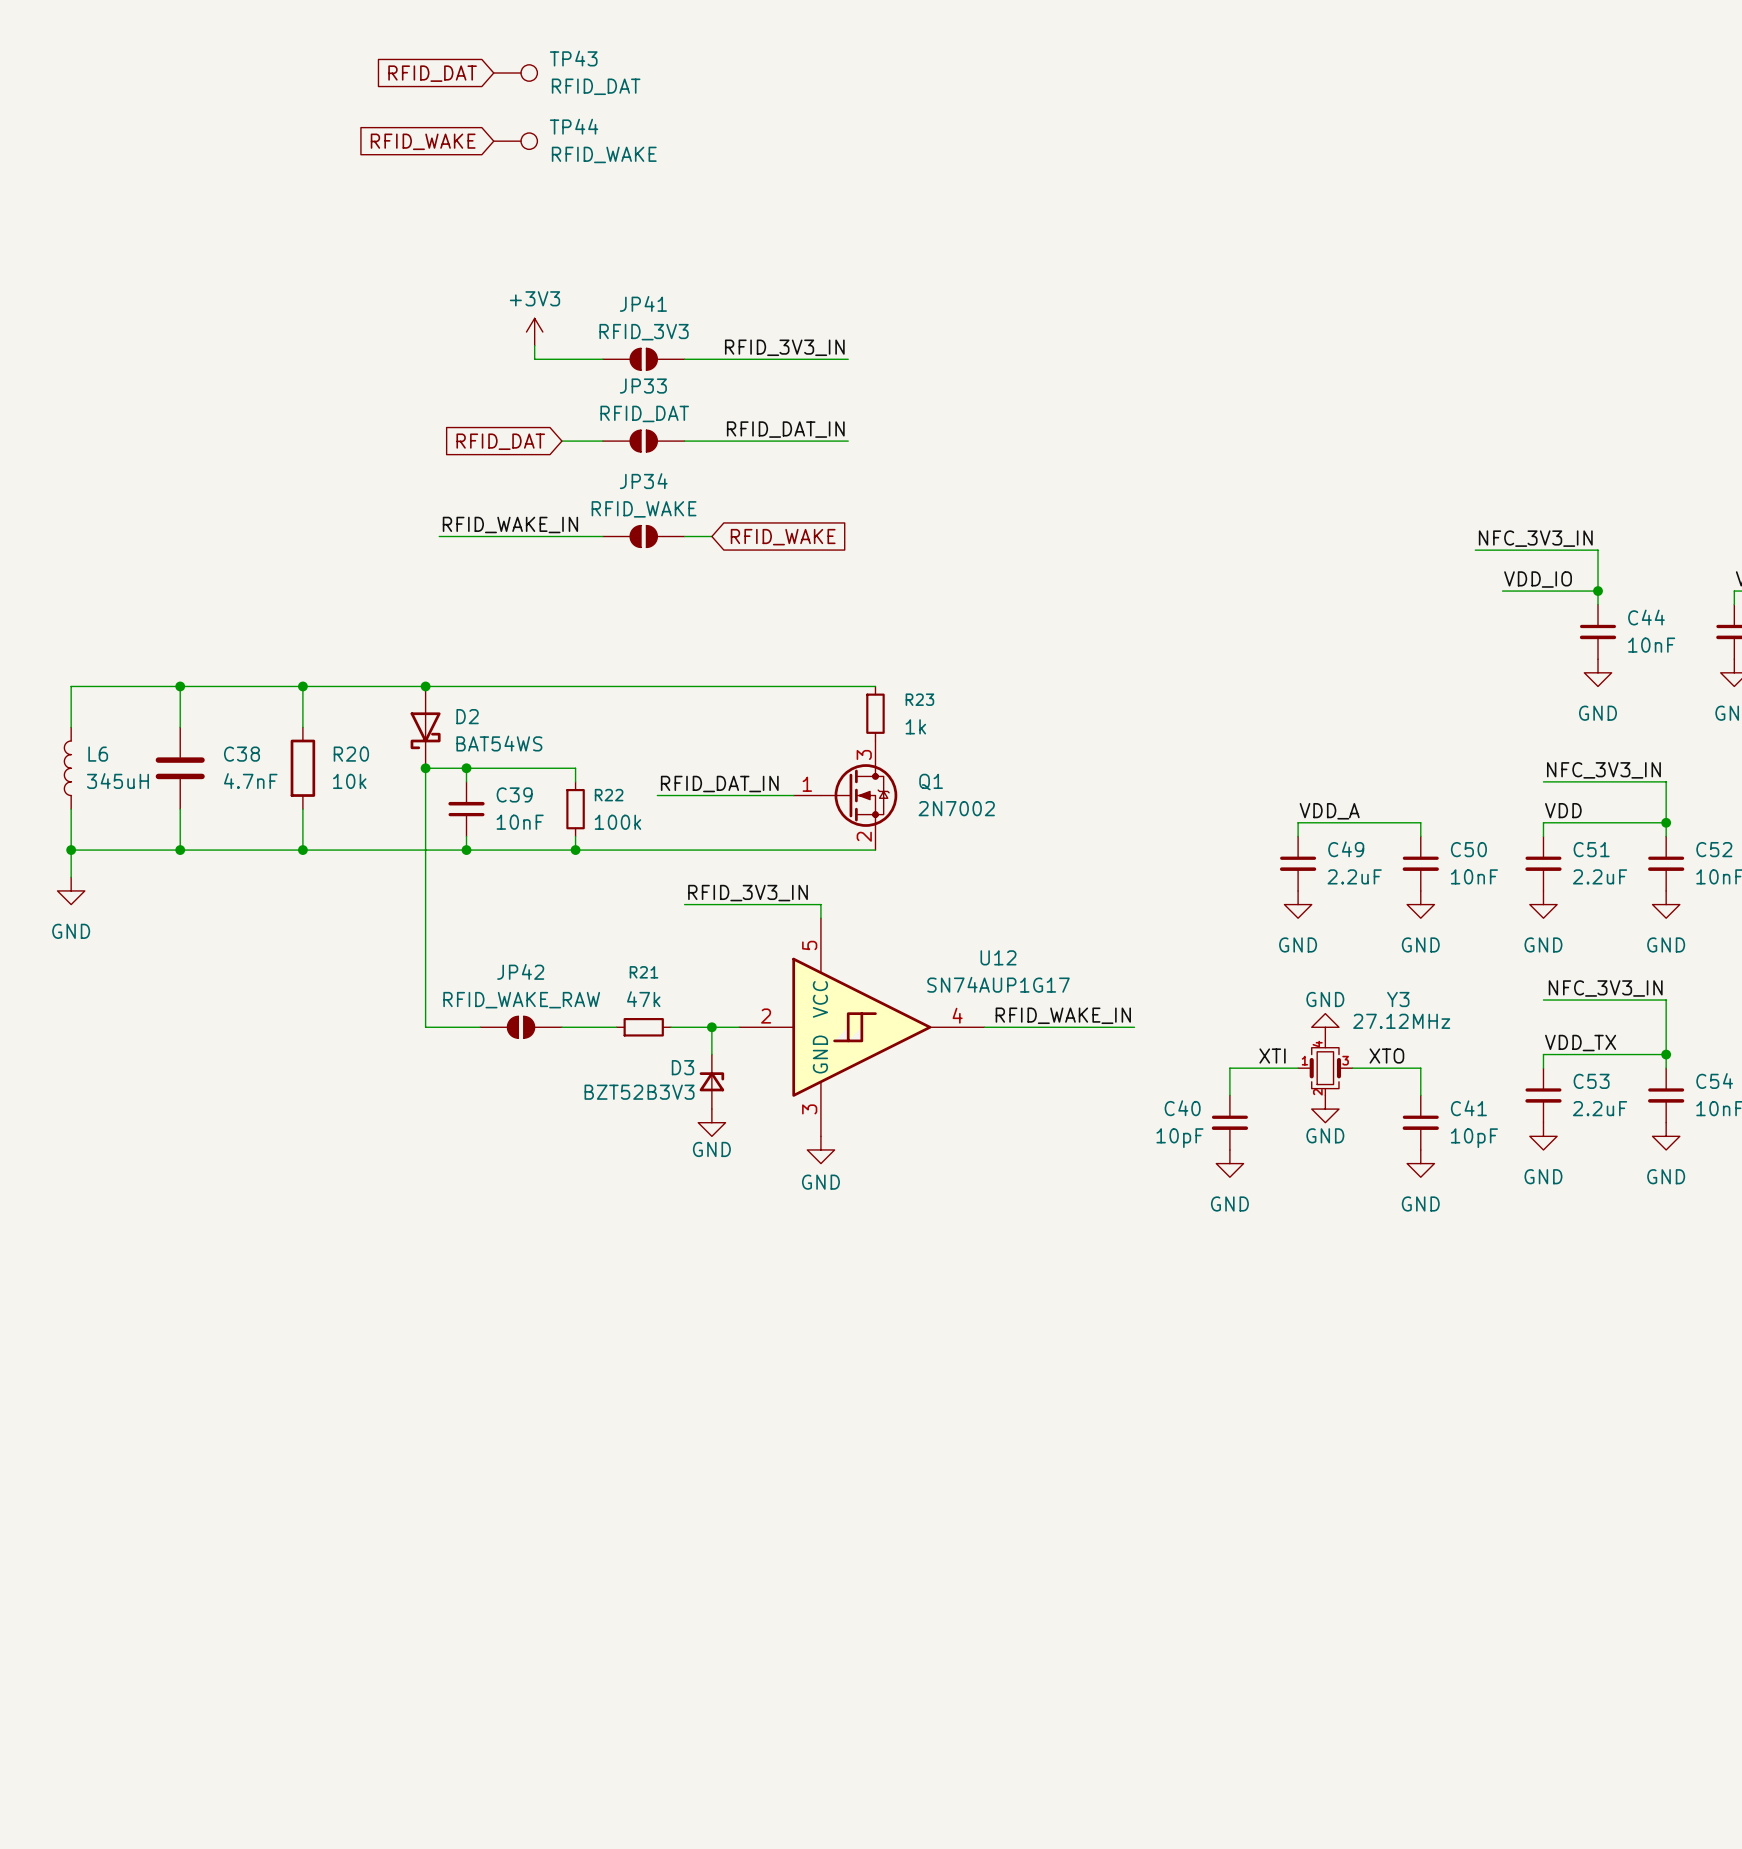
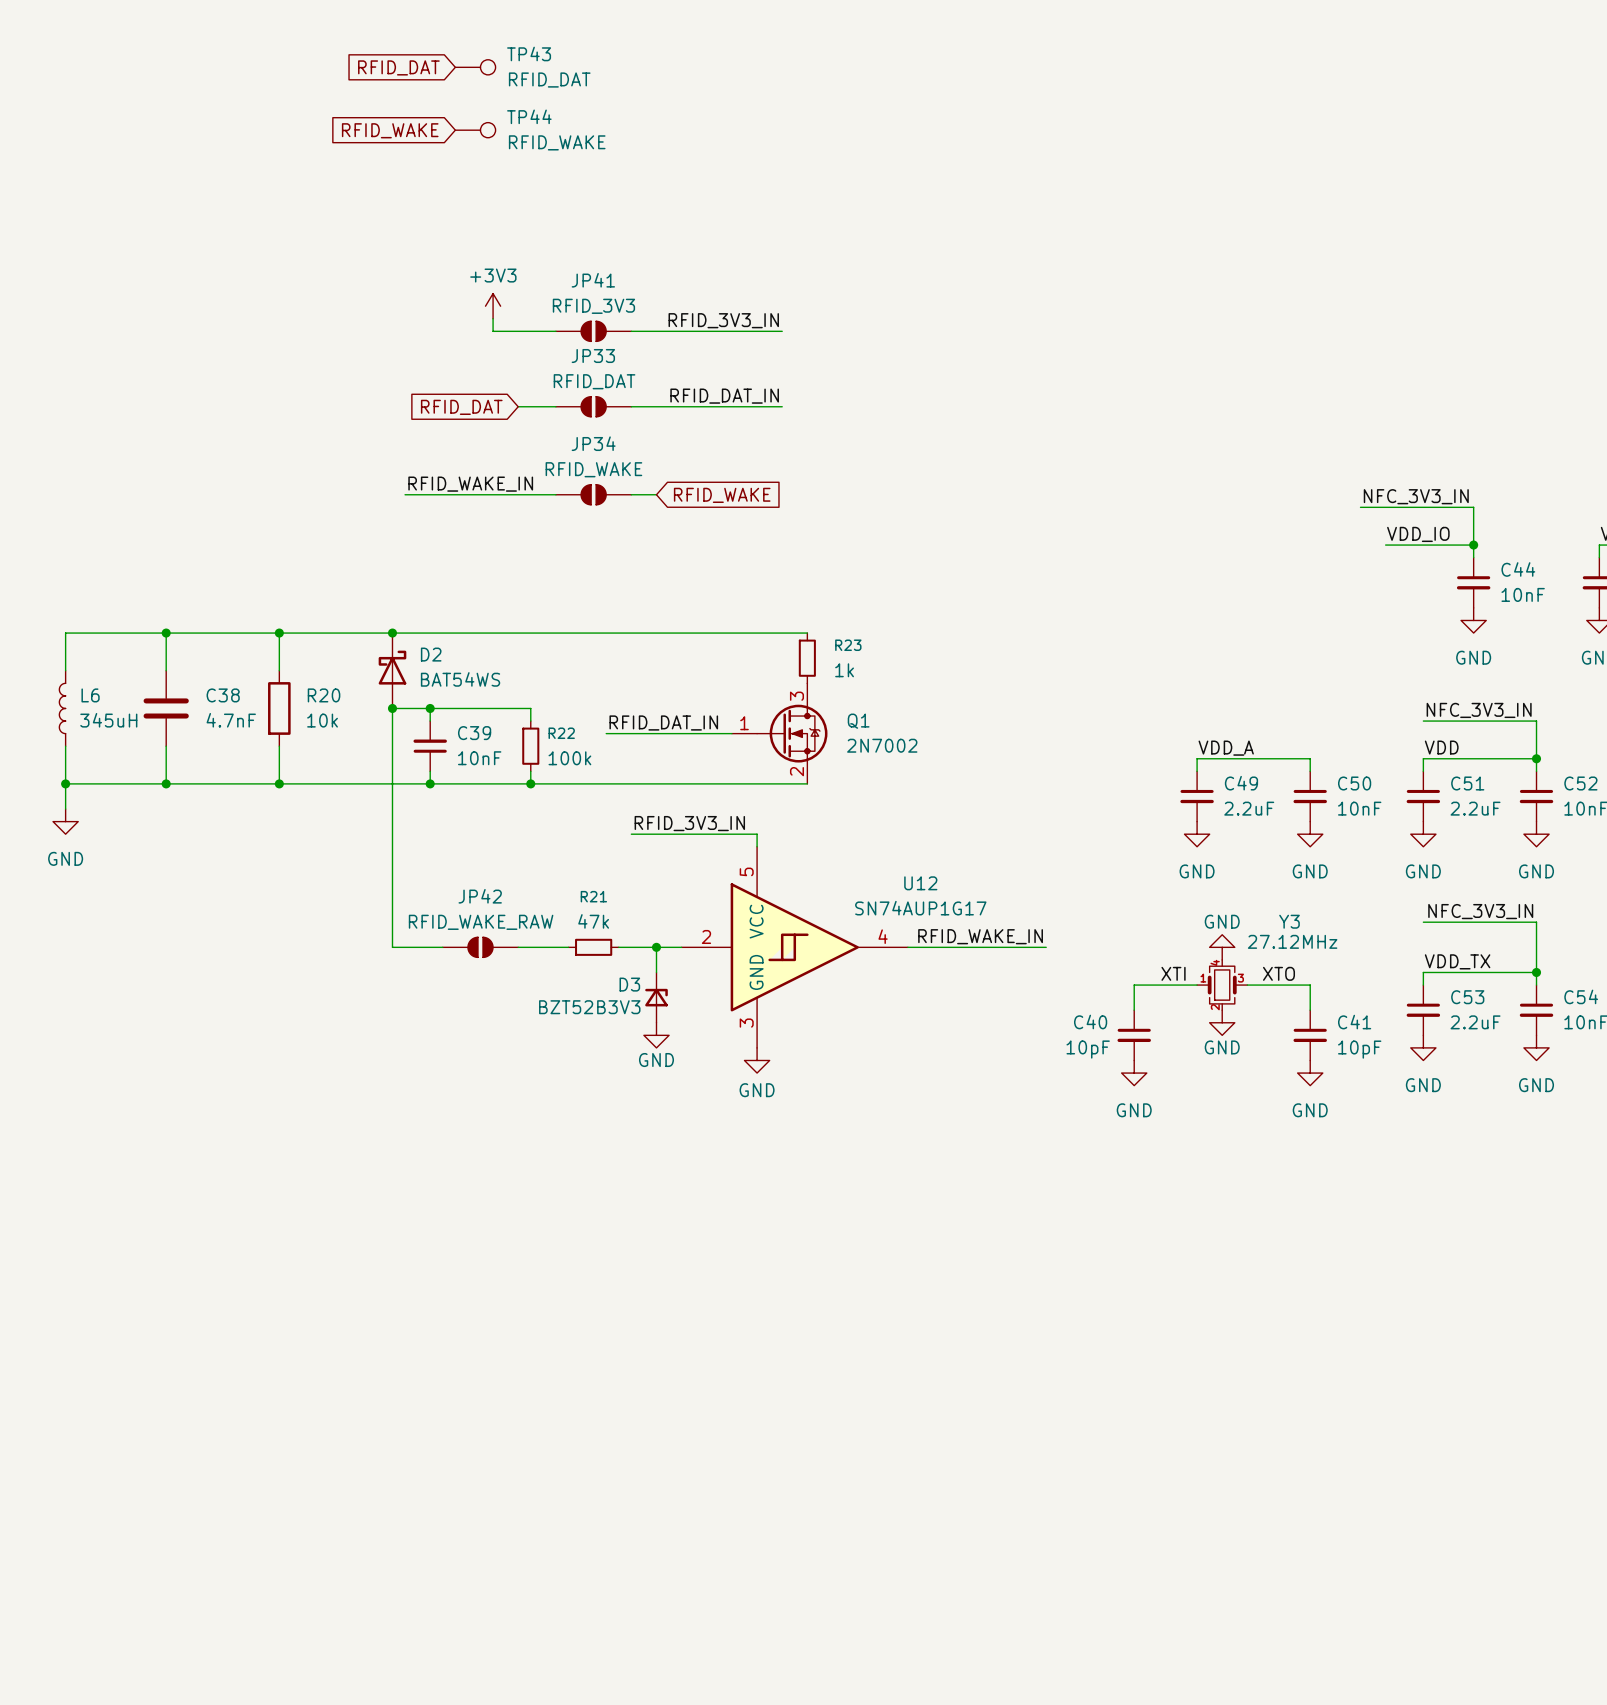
D2 rotation: 0° (425, 730) -> 180° (392, 667)

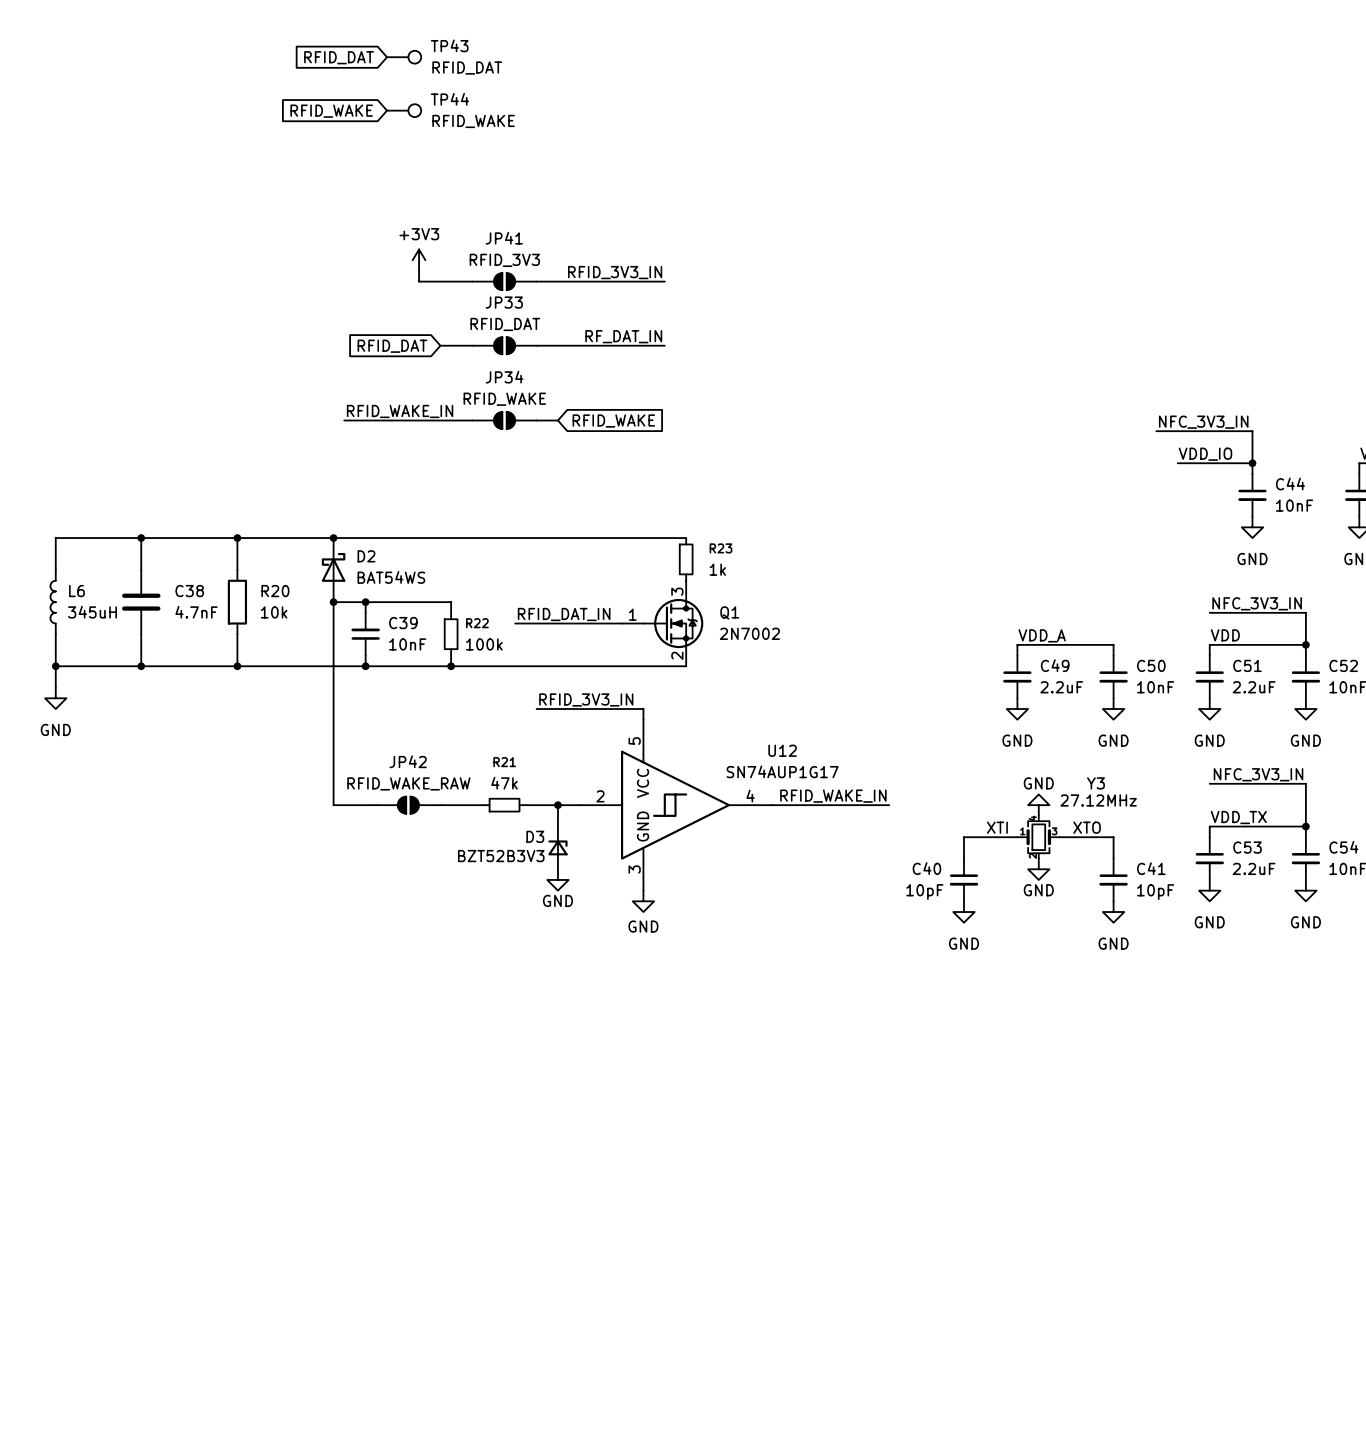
label: RFID_DAT_IN (724, 396) -> RF_DAT_IN (623, 336)

